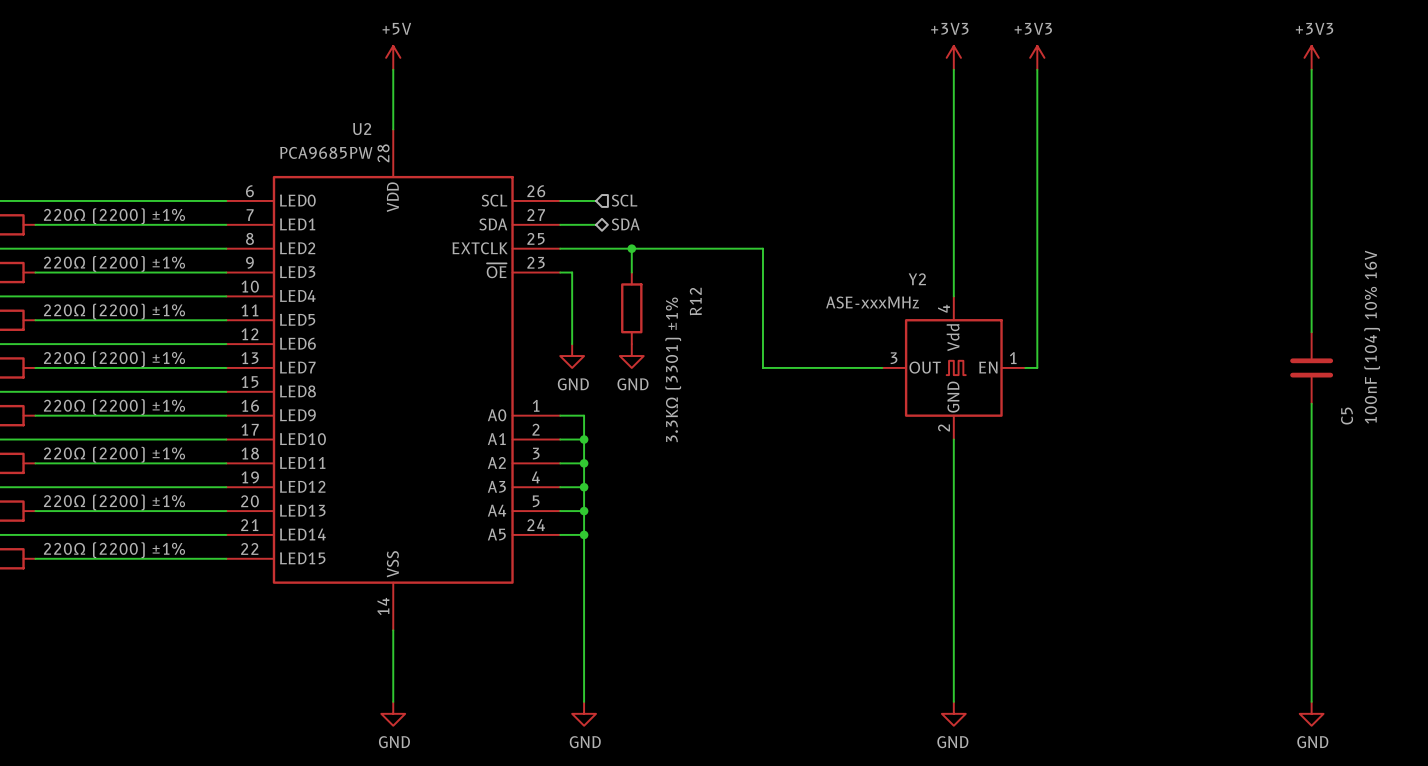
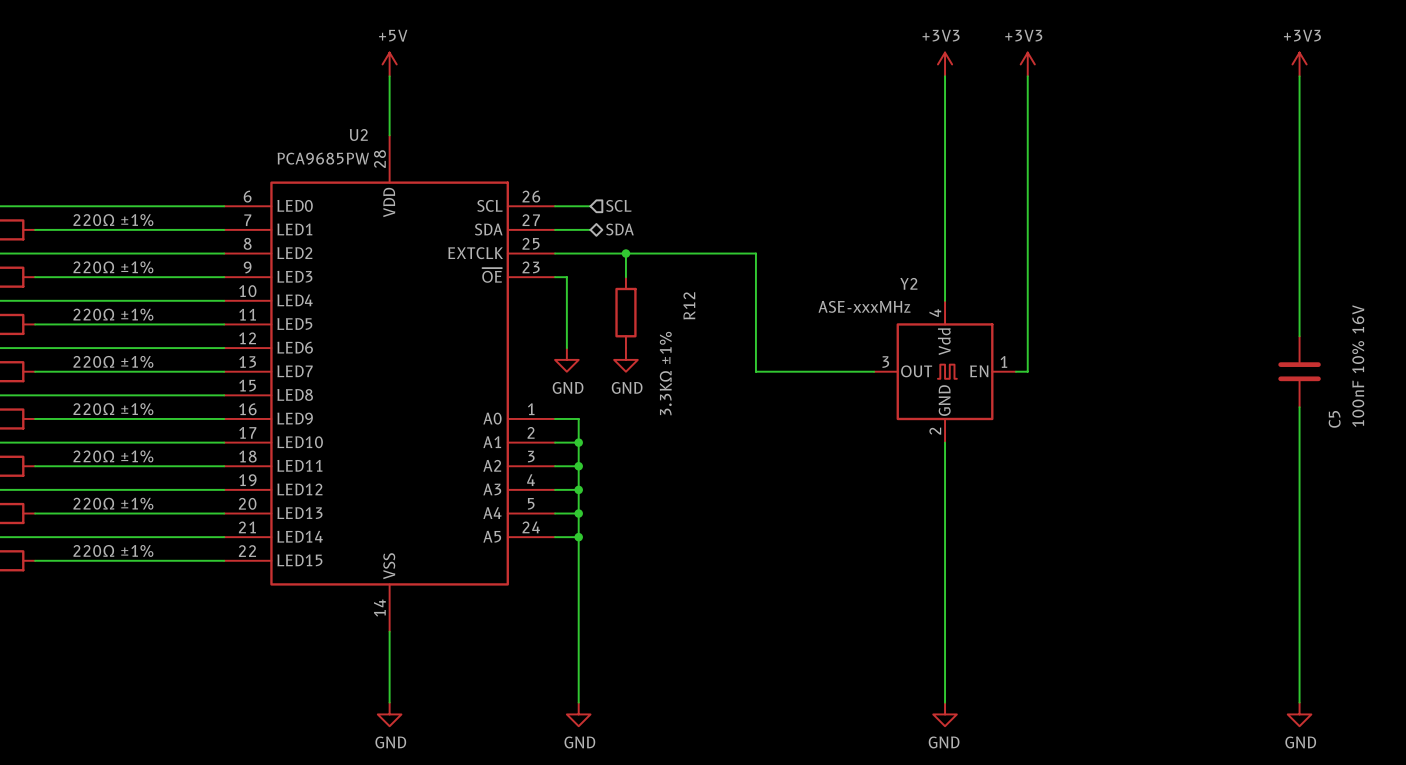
part value: 220Ω (2200) ±1% (114, 216) -> 220Ω ±1% (113, 220)
part value: 220Ω (2200) ±1% (114, 263) -> 220Ω ±1% (113, 267)
part value: 220Ω (2200) ±1% (114, 311) -> 220Ω ±1% (113, 314)
C5 value: 100nF (104) 10% 16V (1372, 337) -> 100nF 10% 16V (1358, 366)
part value: 220Ω (2200) ±1% (114, 359) -> 220Ω ±1% (113, 361)
R12 value: 3.3KΩ (3301) ±1% (673, 369) -> 3.3KΩ ±1% (665, 373)
part value: 220Ω (2200) ±1% (114, 407) -> 220Ω ±1% (113, 409)
part value: 220Ω (2200) ±1% (114, 454) -> 220Ω ±1% (113, 456)
part value: 220Ω (2200) ±1% (114, 502) -> 220Ω ±1% (113, 503)
part value: 220Ω (2200) ±1% (114, 550) -> 220Ω ±1% (113, 550)

